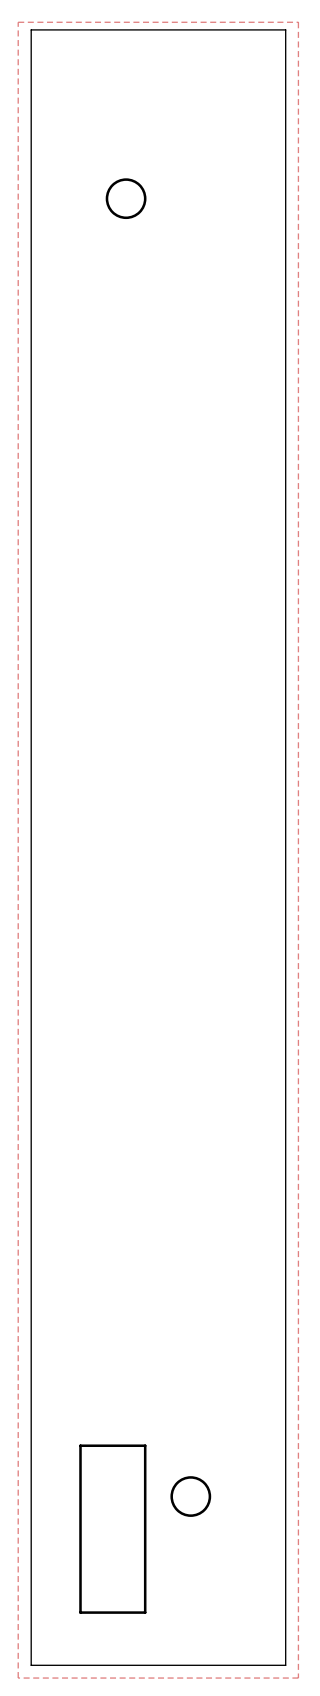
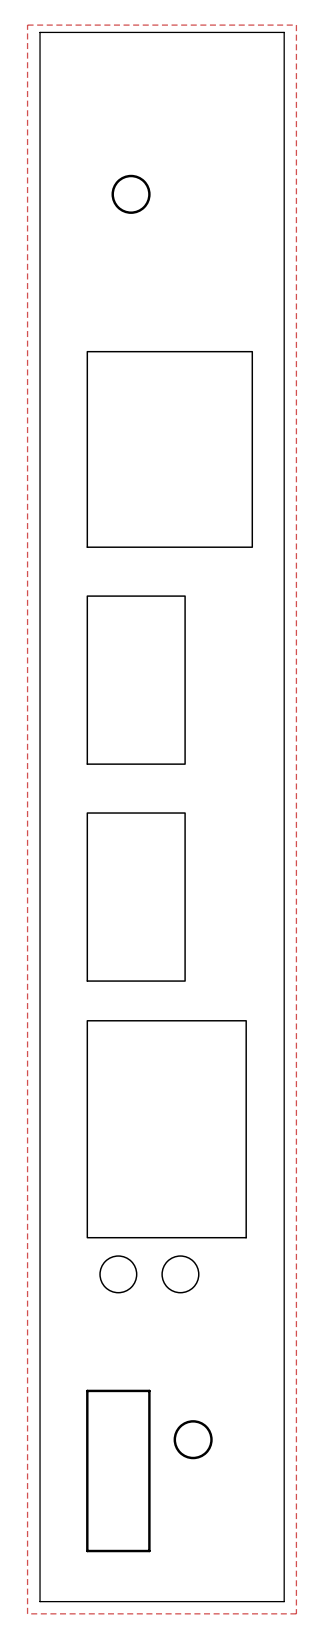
drawing: none -> [86, 350, 254, 1294]

